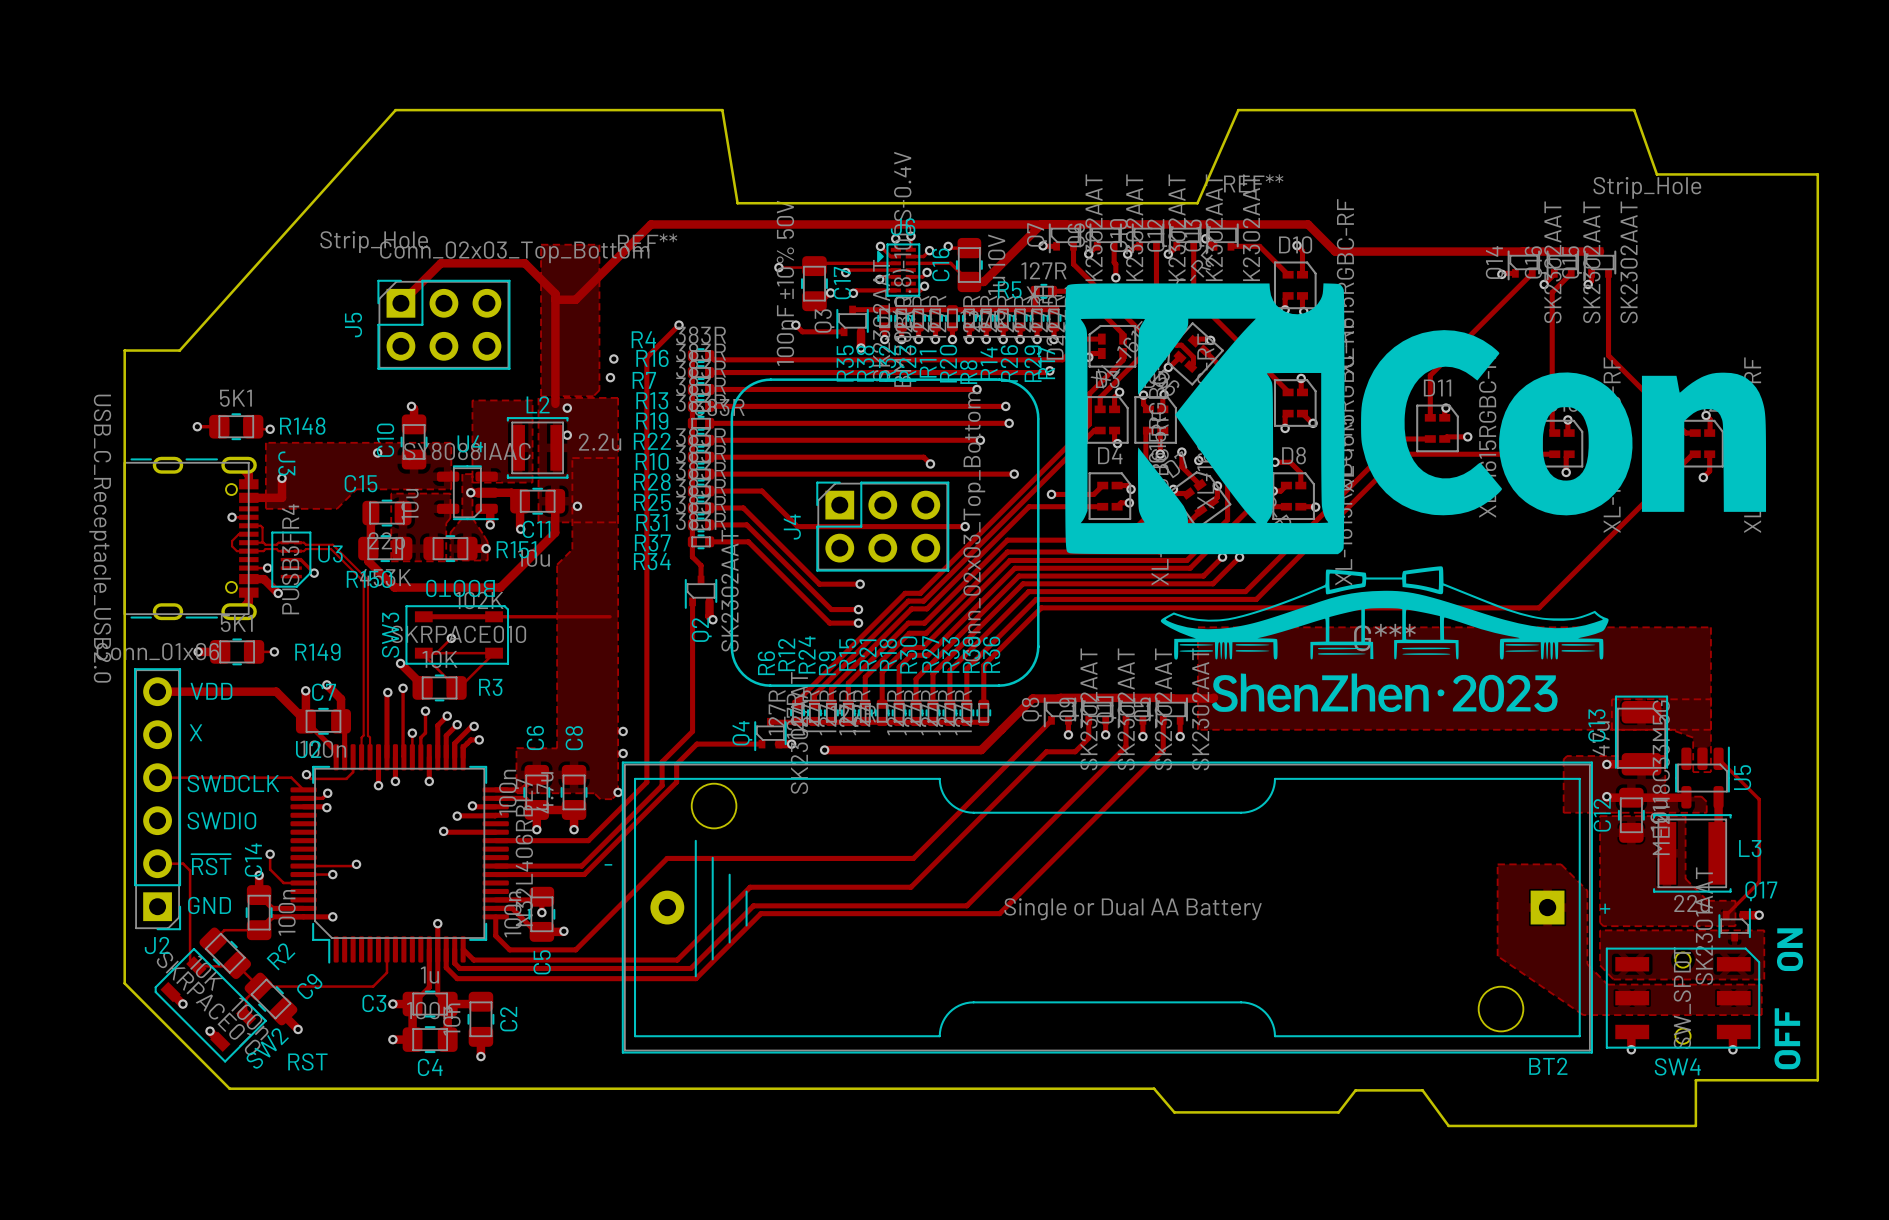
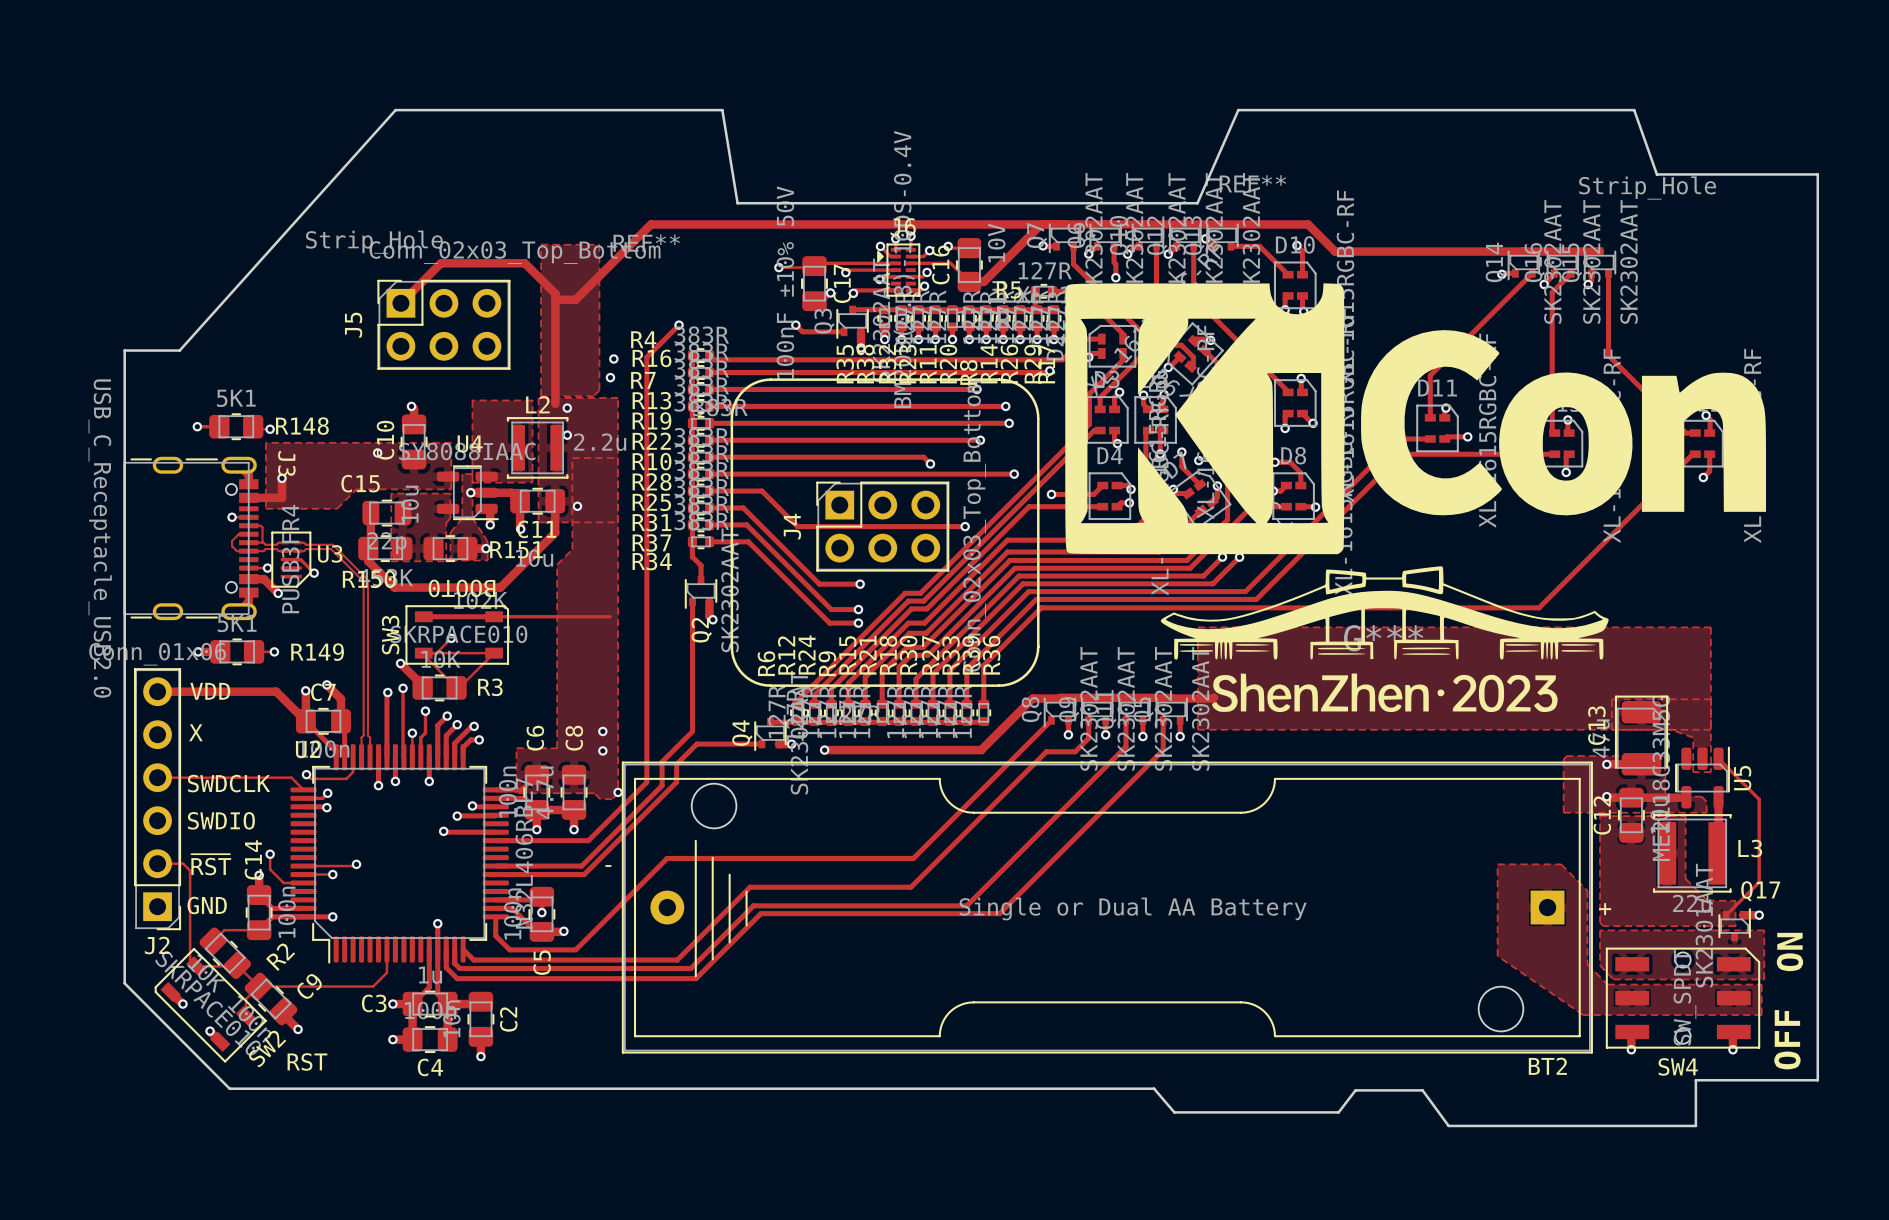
via: none -> (602, 731)
via: (623, 731) -> none
via: none -> (602, 750)
via: (623, 753) -> none

